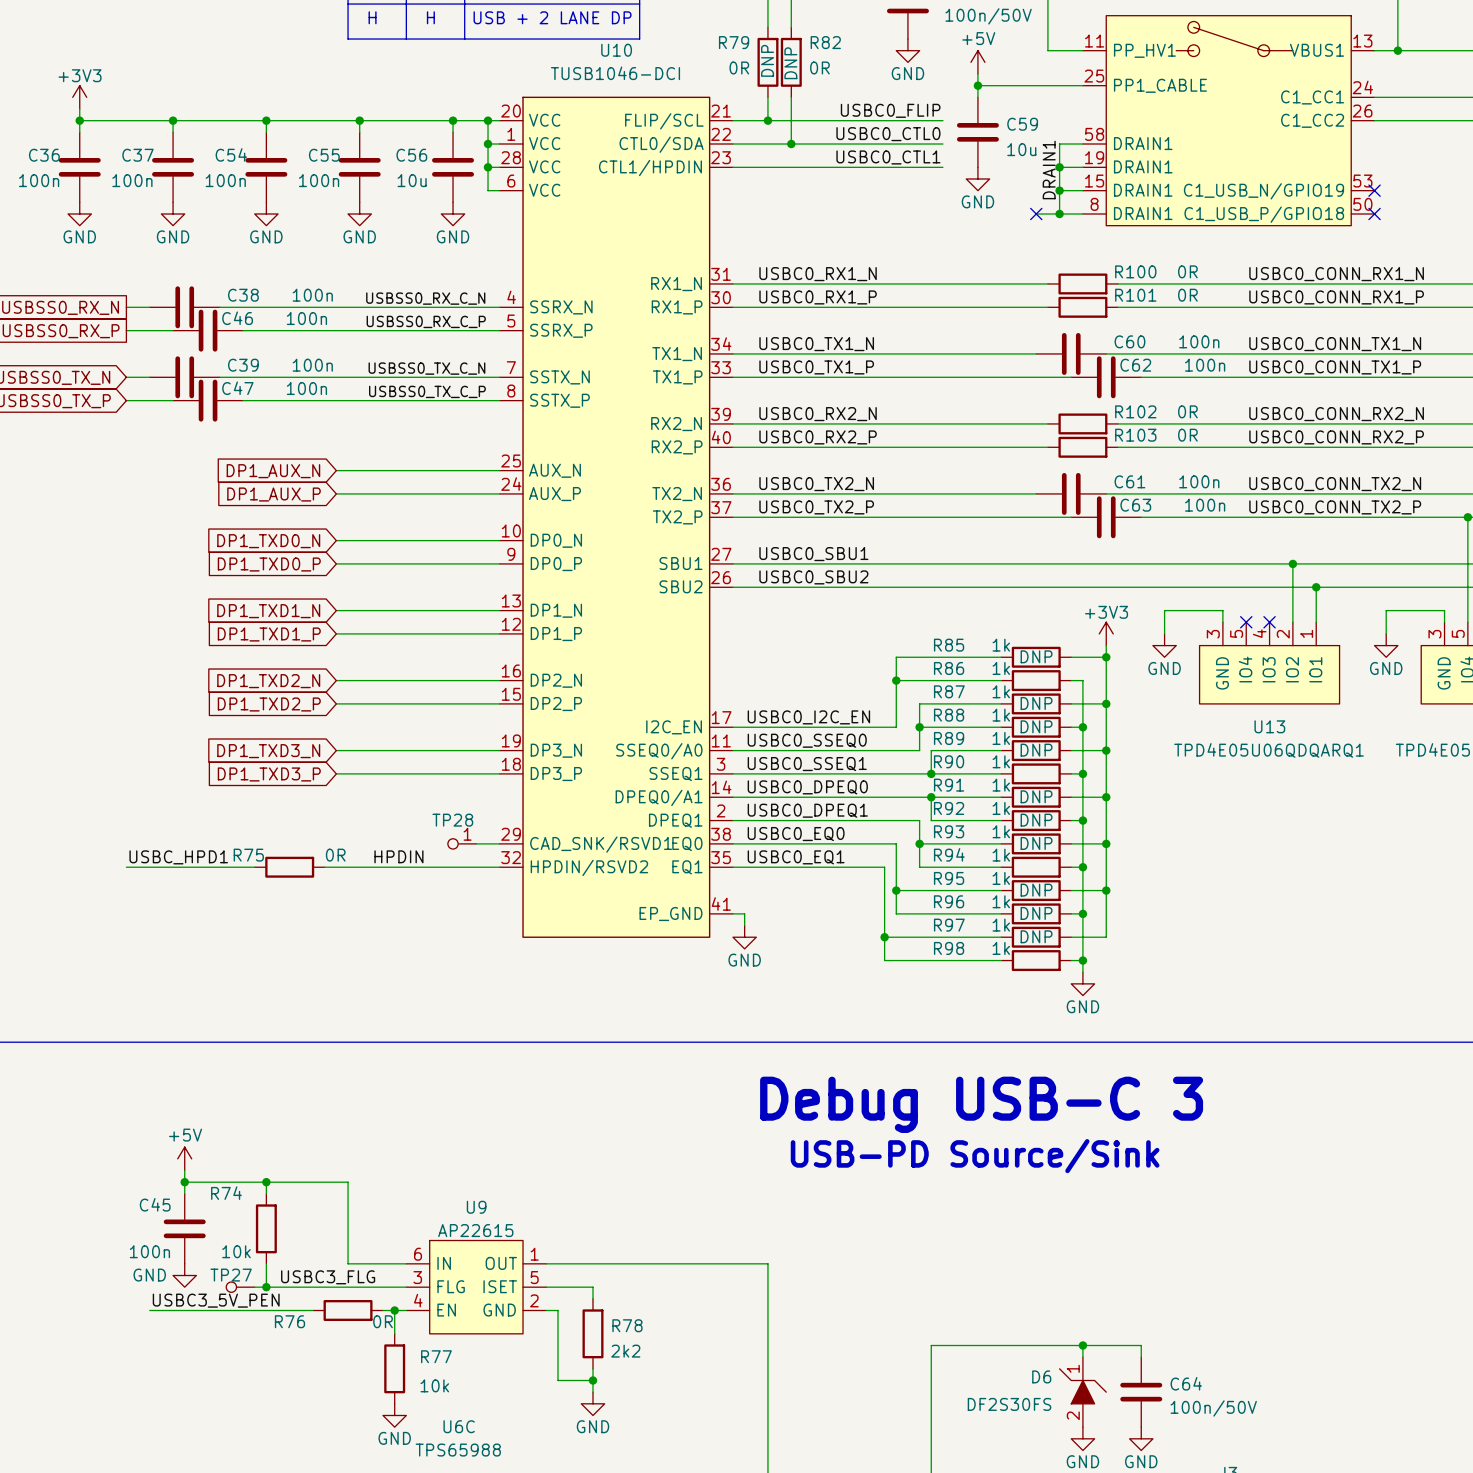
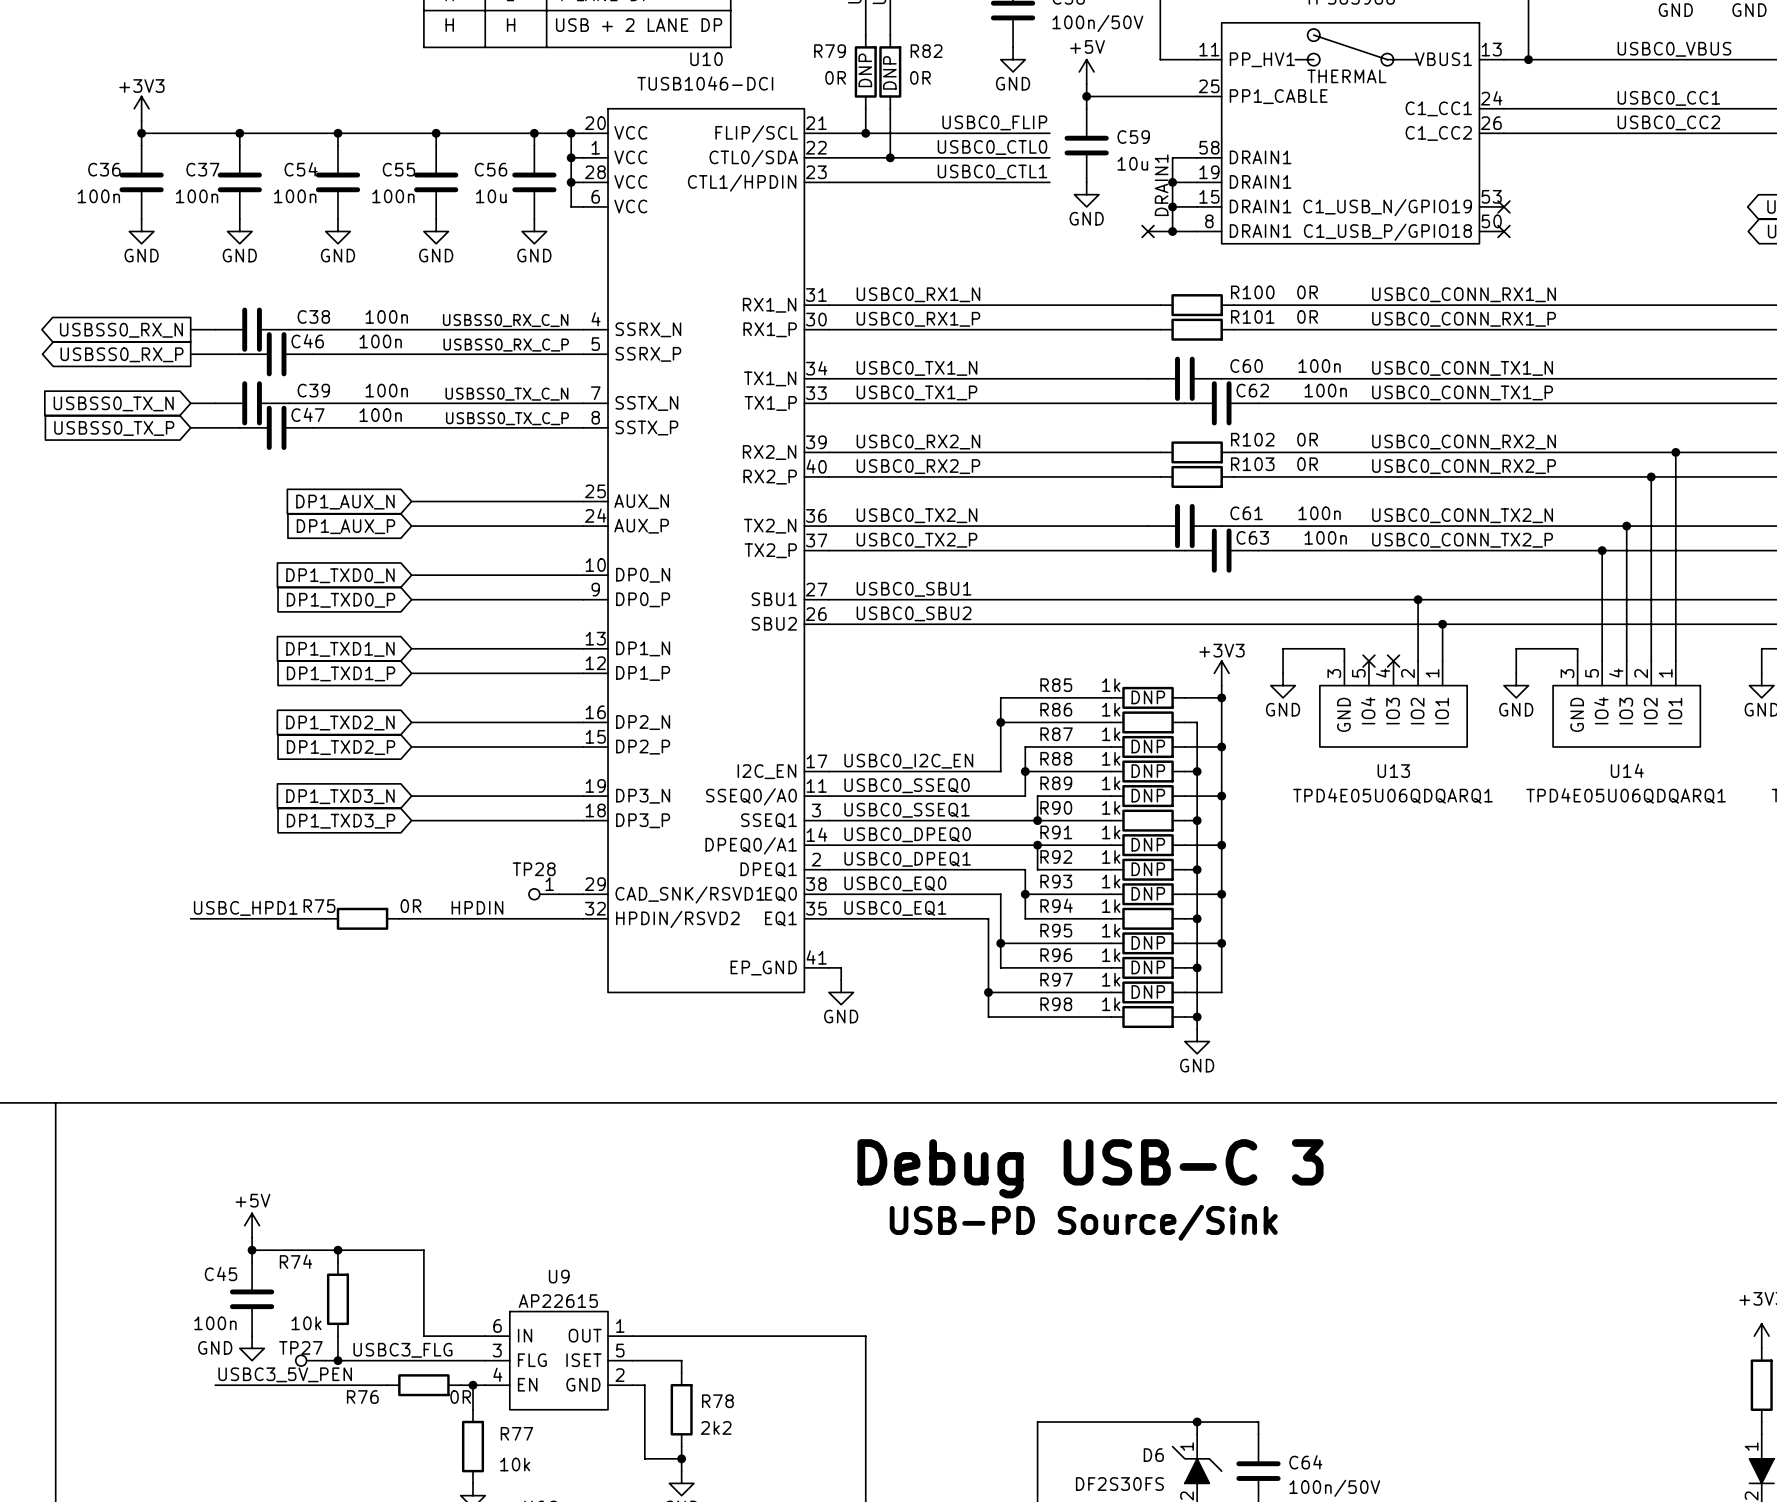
part text: none -> THERMAL (1346, 76)

